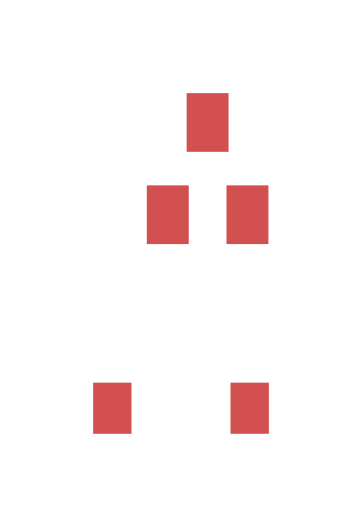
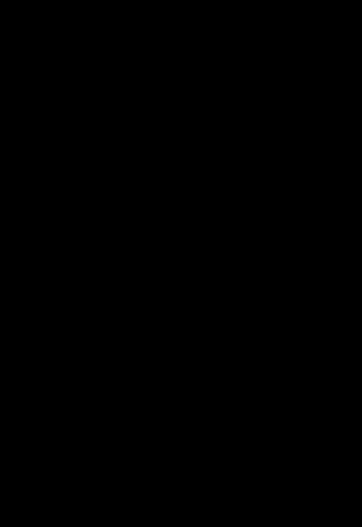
part: (207, 168) -> none
part: (180, 408) -> none

